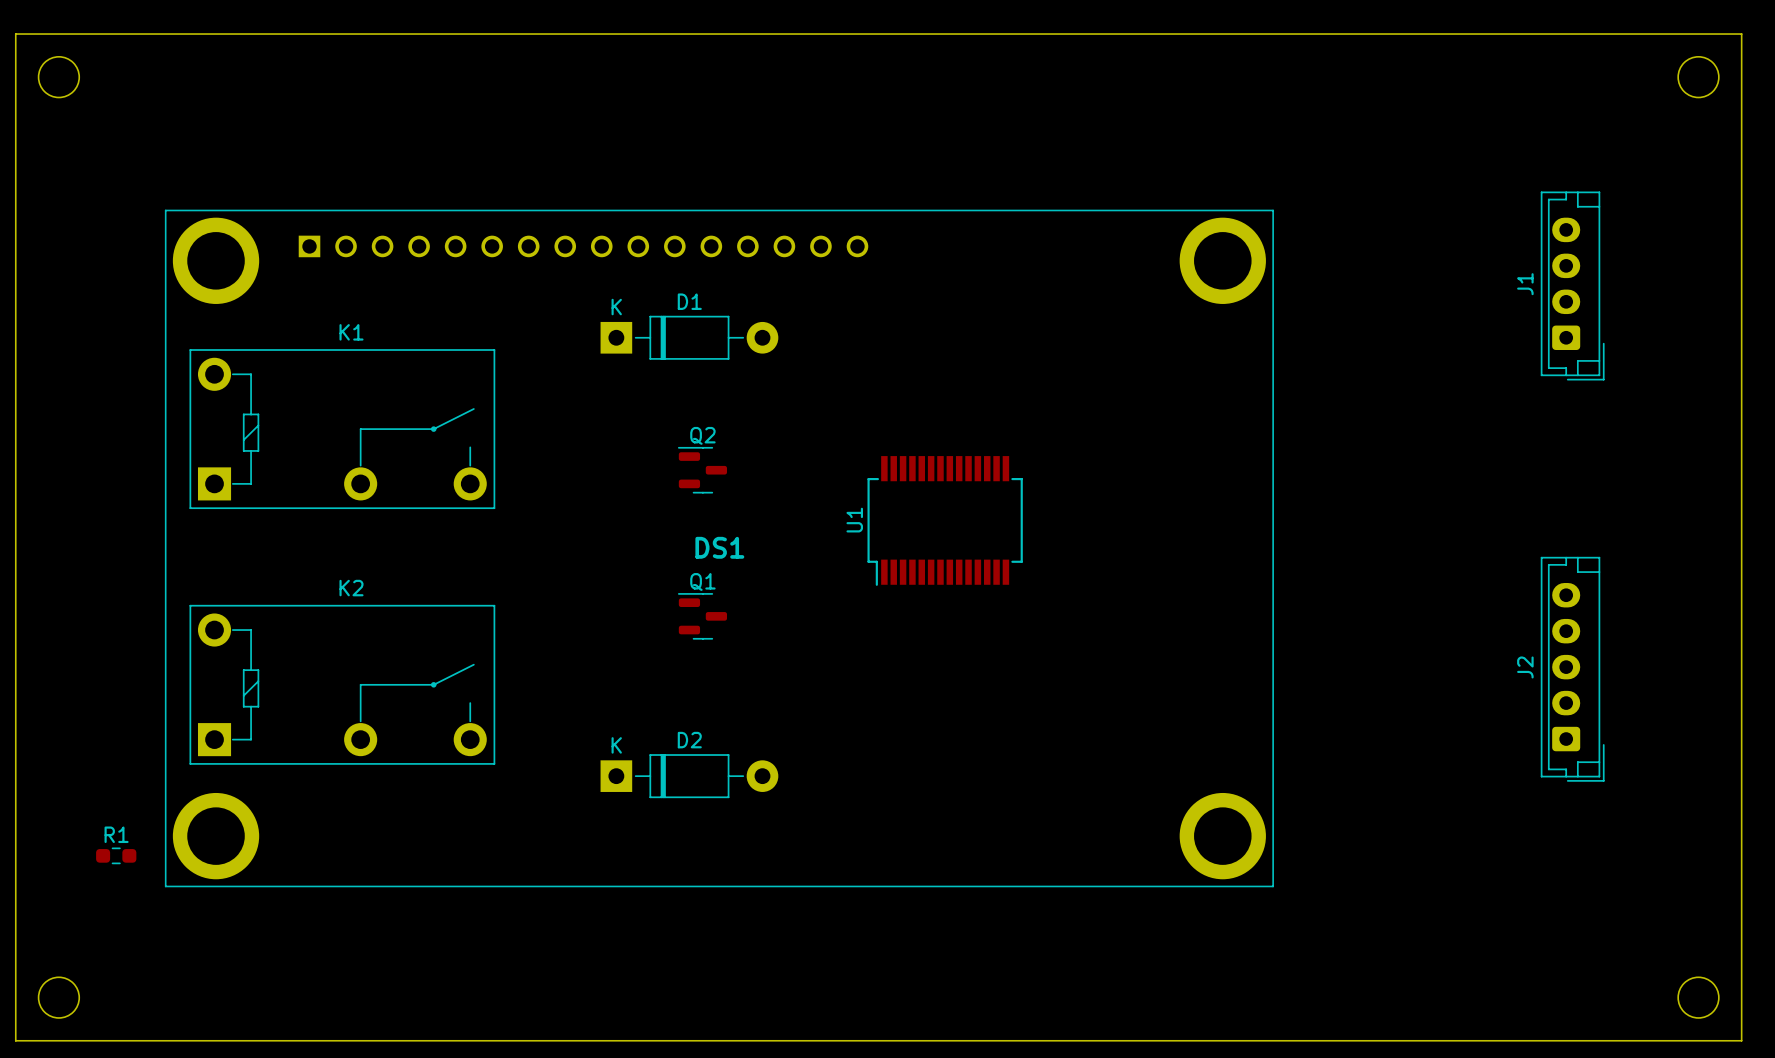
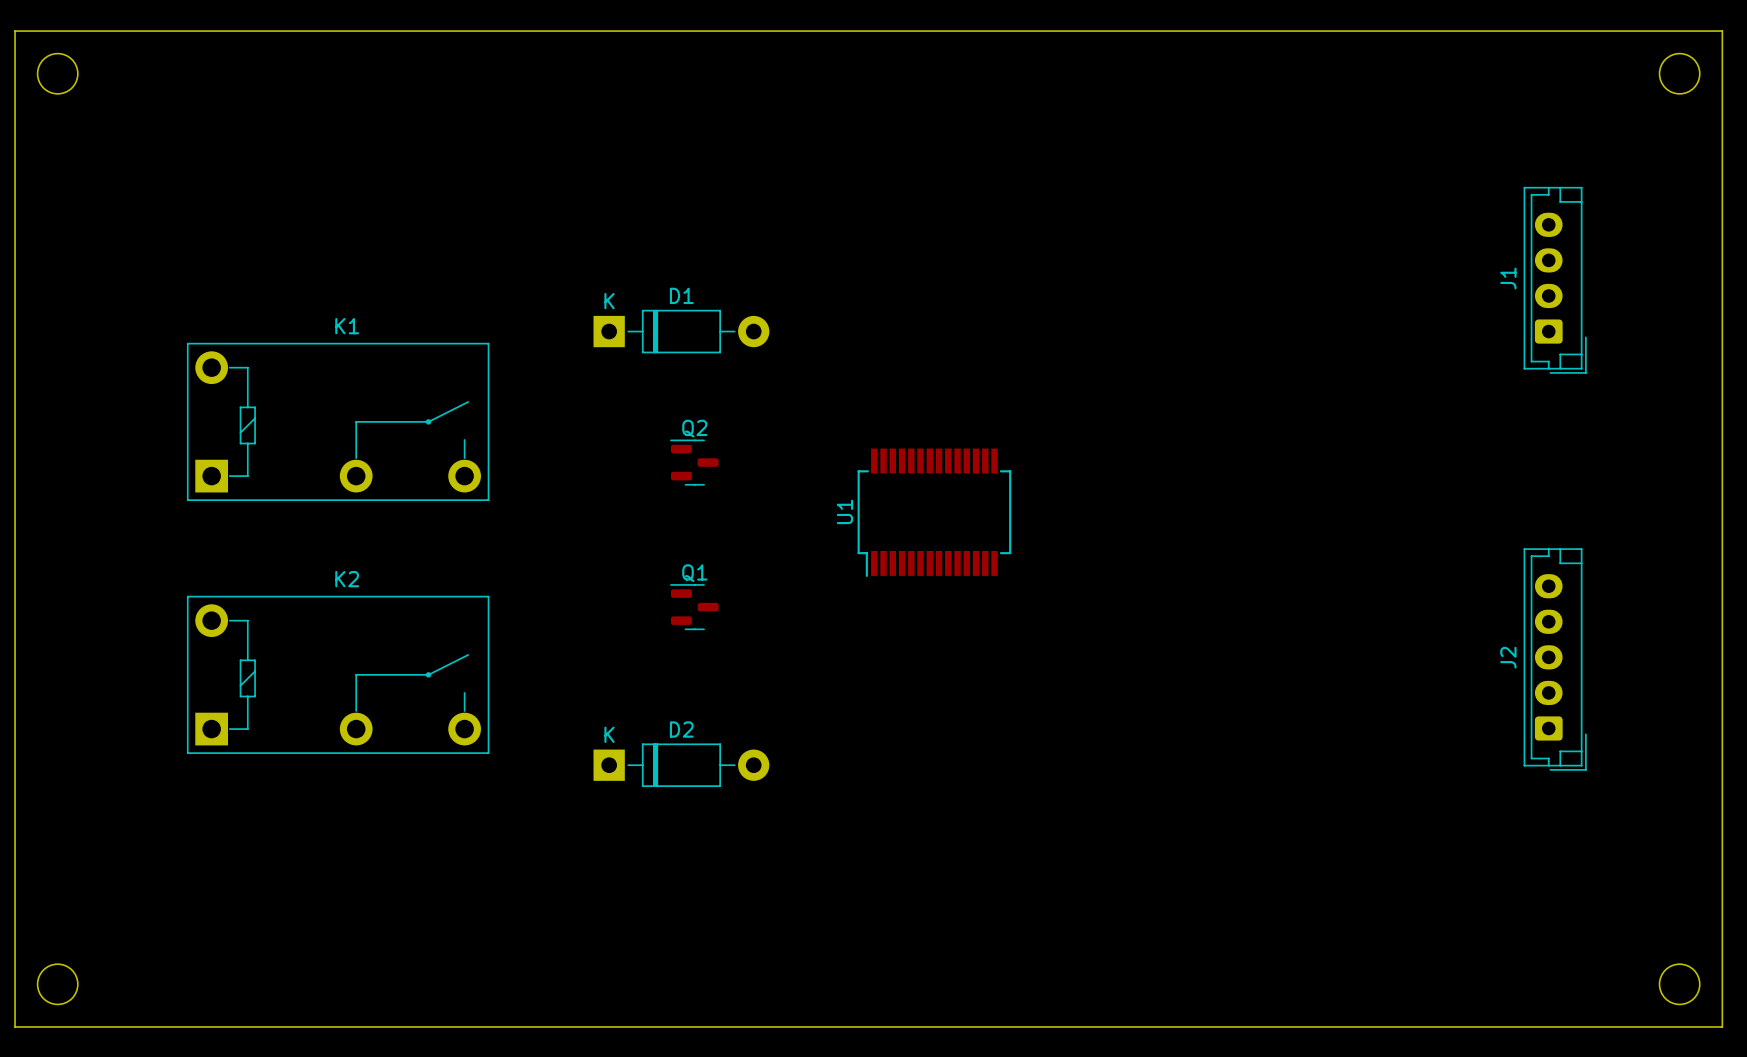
DS1: (719, 548) -> none
R1: (116, 855) -> none

